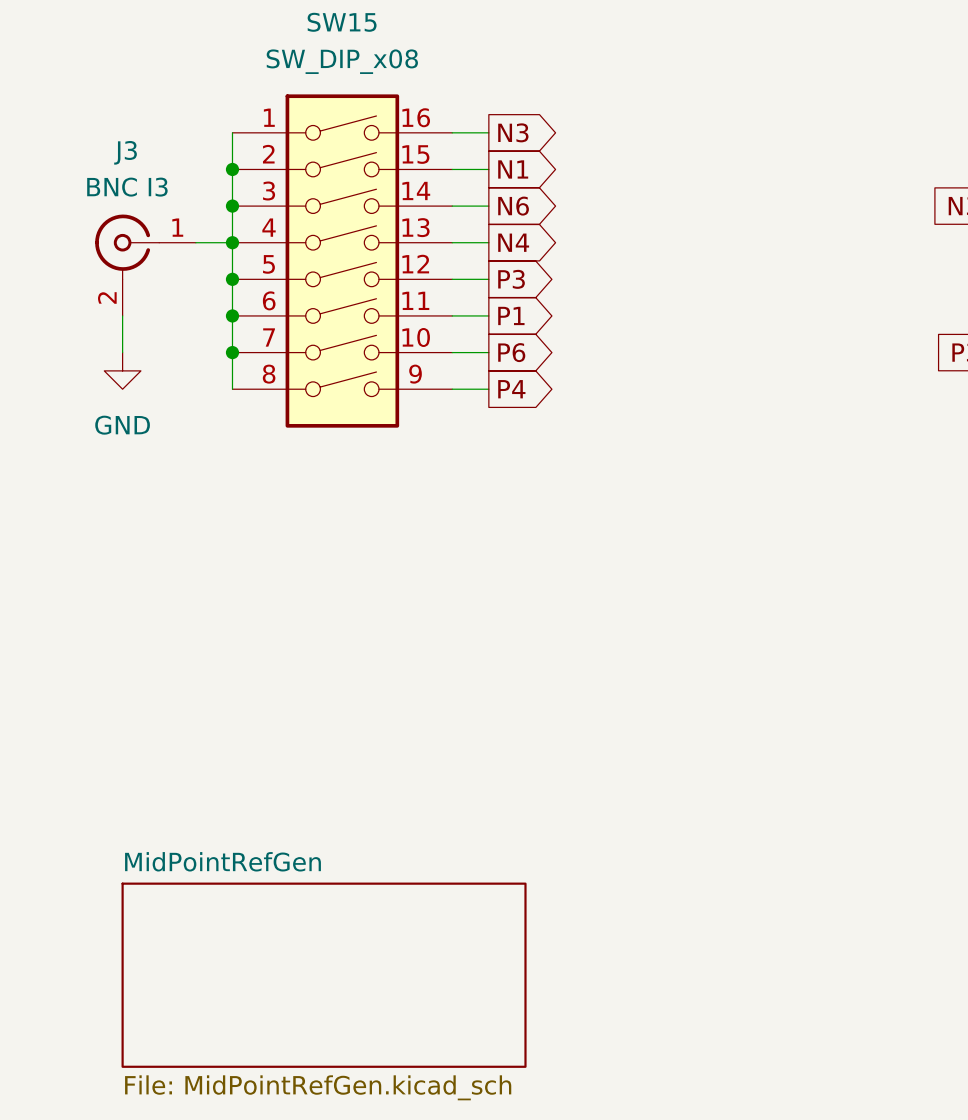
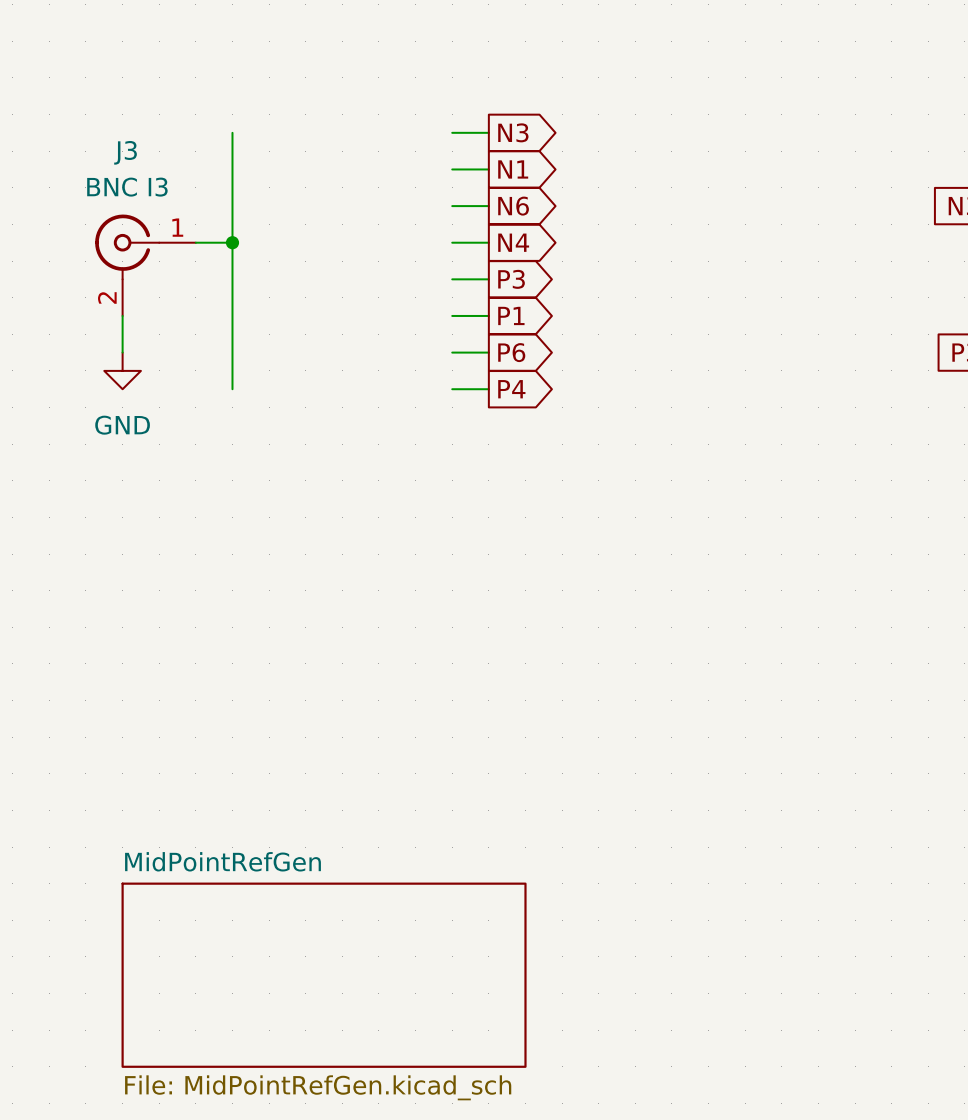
junction: (232, 169) -> none
junction: (232, 206) -> none
SW15: SW_DIP_x08 (342, 261) -> none
junction: (232, 279) -> none
junction: (232, 315) -> none
junction: (232, 352) -> none

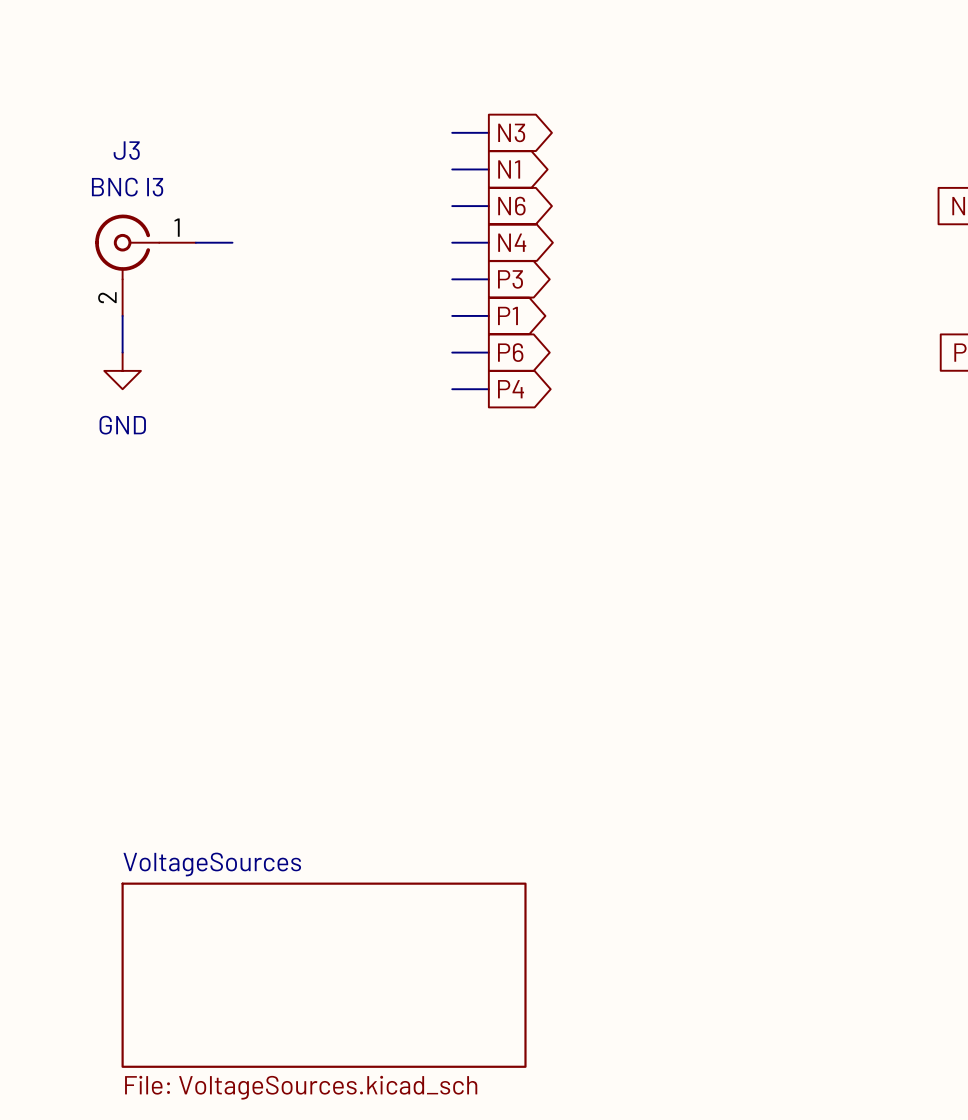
wire: (232, 132) (232, 389) -> none
junction: (232, 242) -> none
sheet MidPointRefGen name: MidPointRefGen (223, 861) -> VoltageSources (212, 864)
sheet MidPointRefGen value: File: MidPointRefGen.kicad_sch (318, 1087) -> File: VoltageSources.kicad_sch (301, 1087)

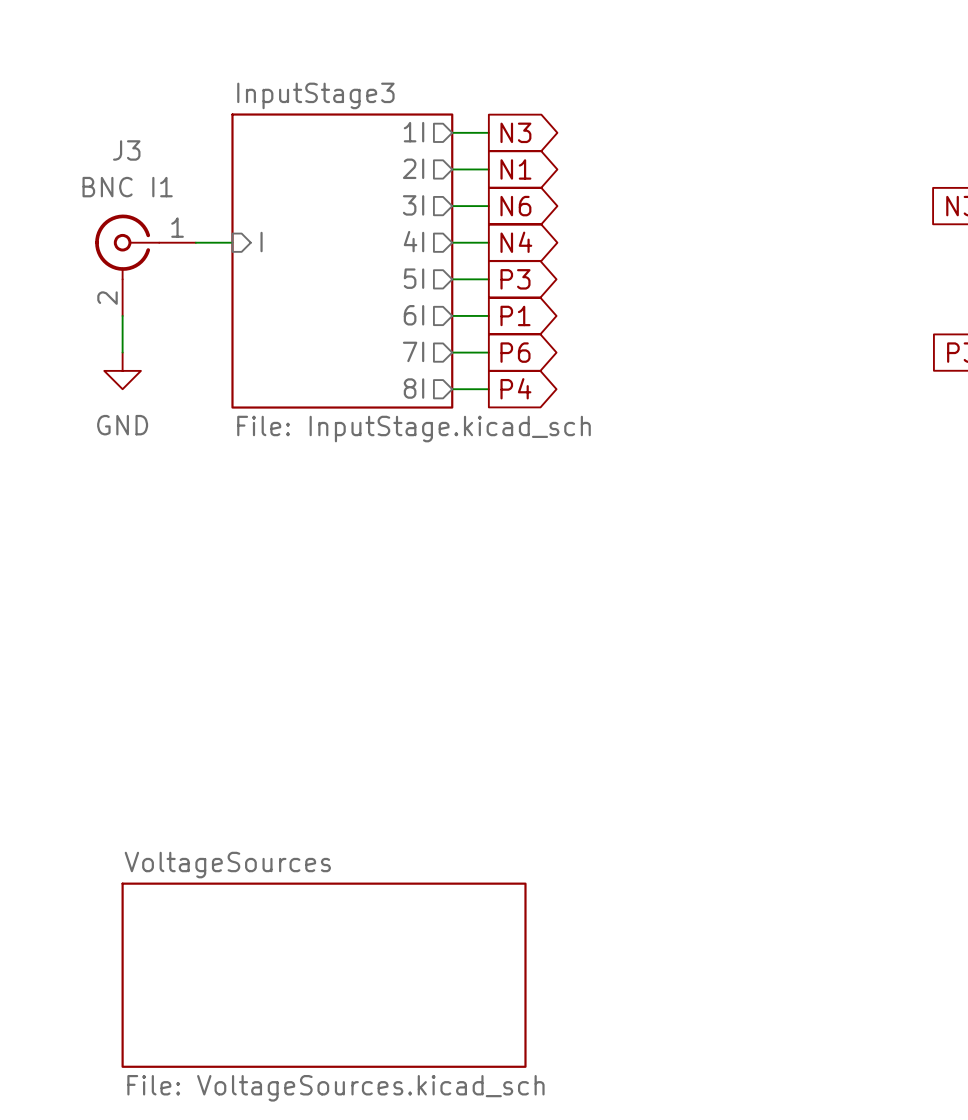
sheet pin: none -> 1I (414, 132)
sheet pin: none -> 2I (413, 168)
J3 value: BNC I3 (127, 187) -> BNC I1 (127, 187)
sheet pin: none -> 3I (413, 205)
sheet pin: none -> I (261, 242)
sheet pin: none -> 4I (414, 241)
sheet InputStage3: none -> File: InputStage.kicad_sch (342, 261)
sheet pin: none -> 5I (414, 278)
sheet pin: none -> 6I (414, 315)
sheet pin: none -> 7I (413, 351)
sheet pin: none -> 8I (414, 388)

